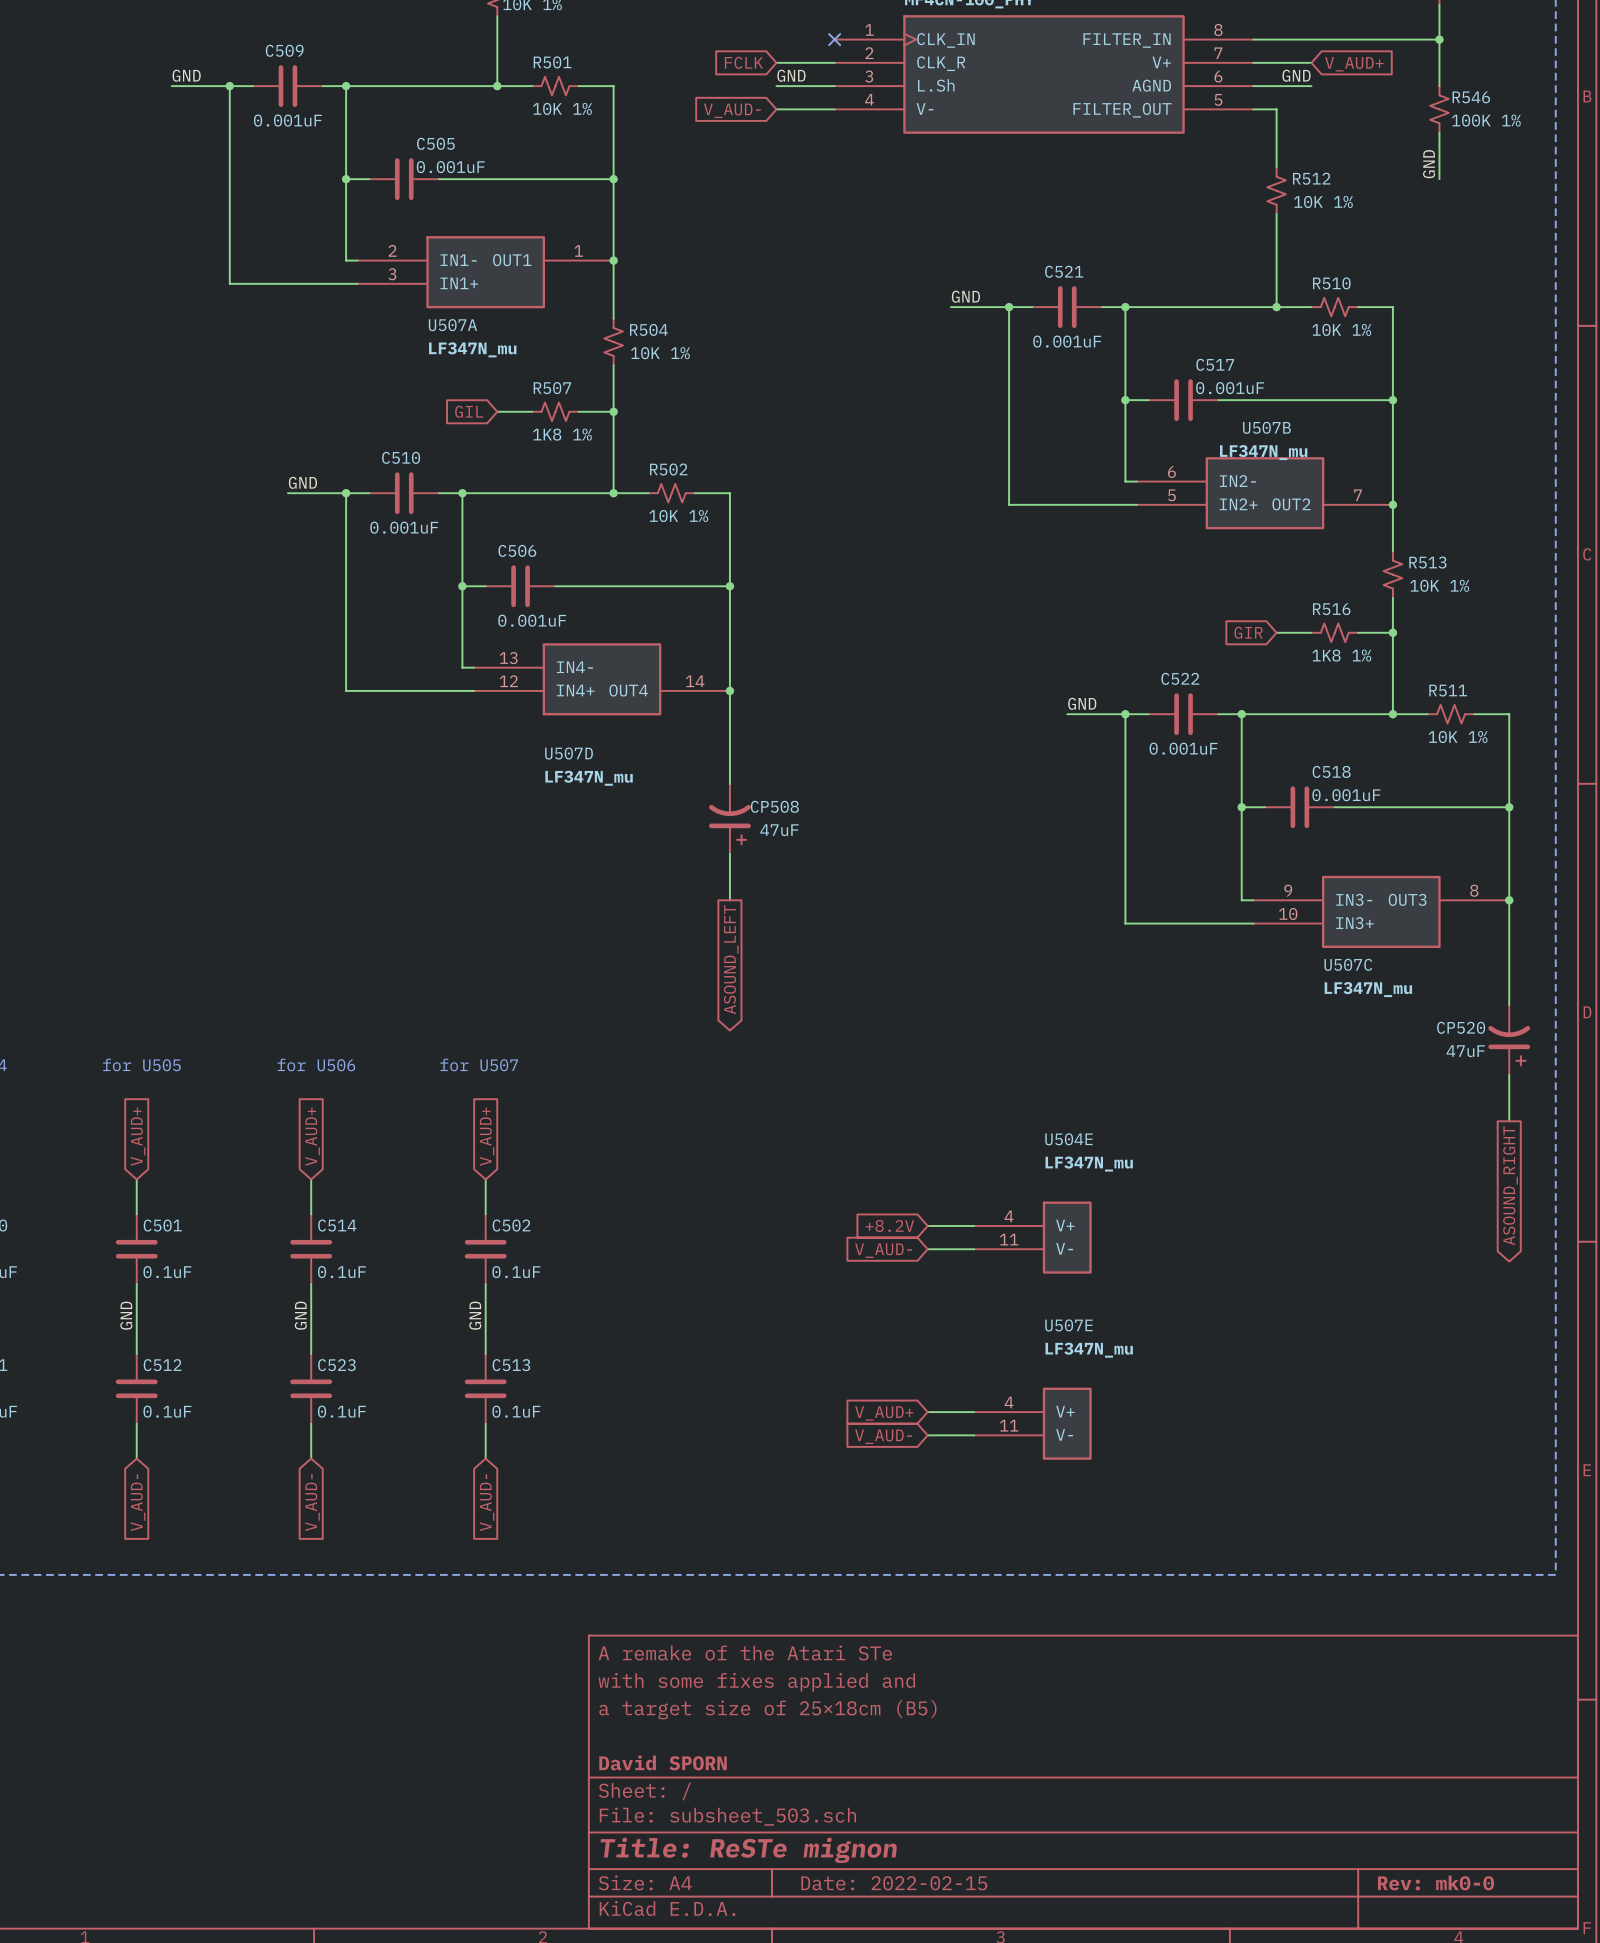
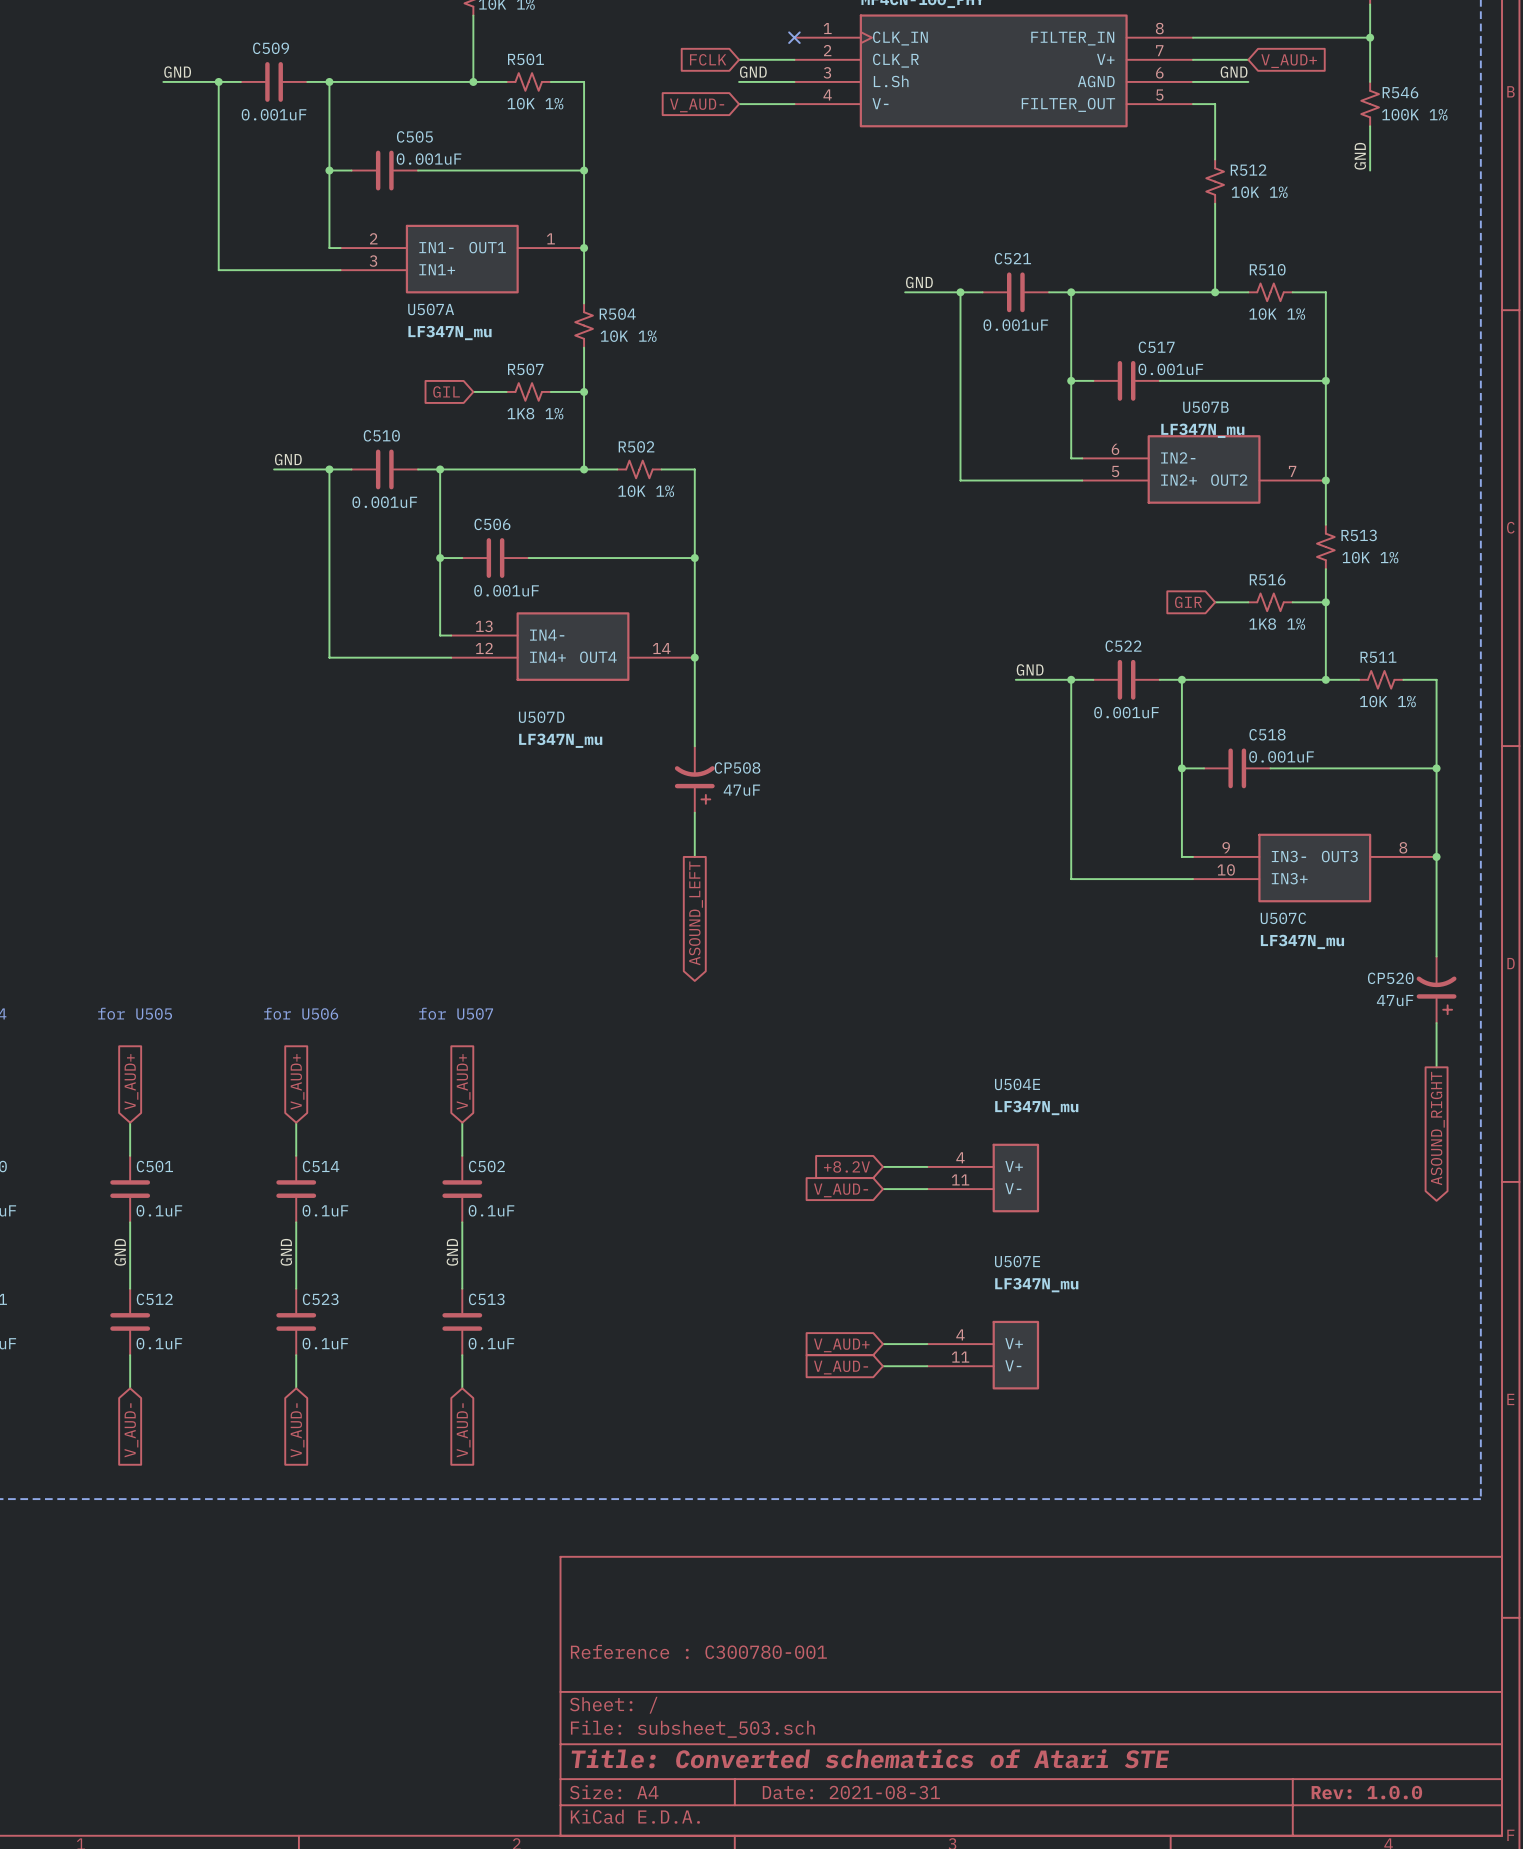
title block: A remake of the Atari STe (745, 1653) -> none
title block: with some fixes applied and (756, 1682) -> none
title block: a target size of 25×18cm (B5) (767, 1709) -> none
title block: none -> Reference : C300780-001 (698, 1651)
title block: David SPORN (663, 1762) -> none
title block: Title: ReSTe mignon (748, 1850) -> Title: Converted schematics of Atari STE (870, 1758)
title block: Rev: mk0-0 (1436, 1882) -> Rev: 1.0.0 (1366, 1792)
title block: Date: 2022-02-15 (894, 1883) -> Date: 2021-08-31 (851, 1792)

